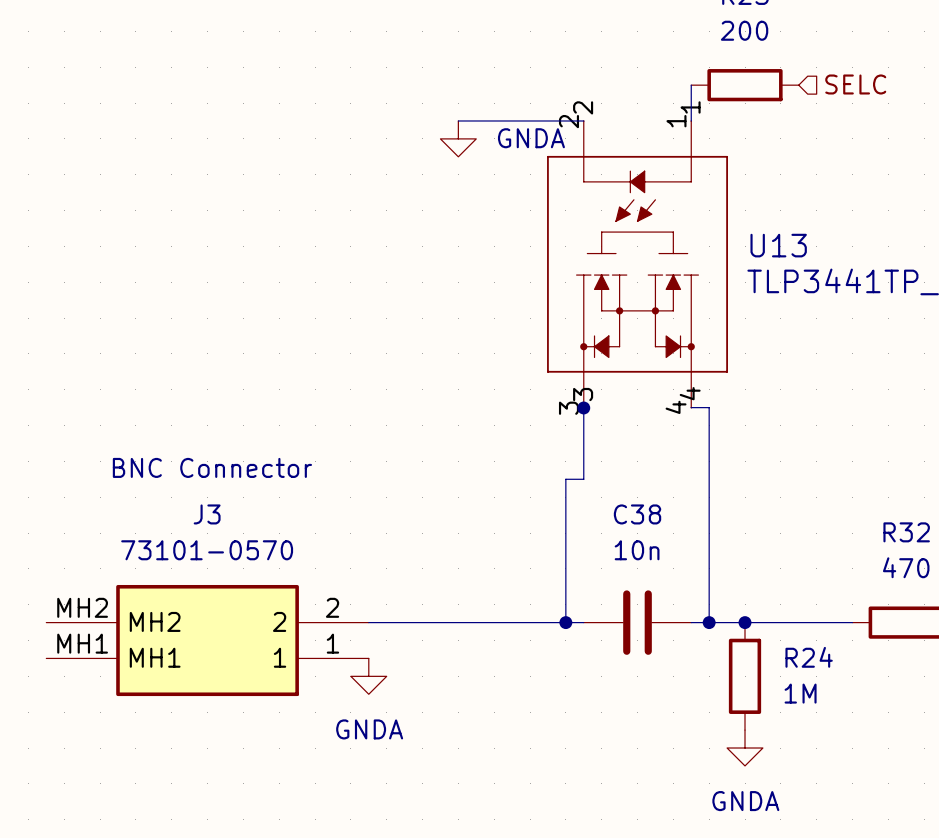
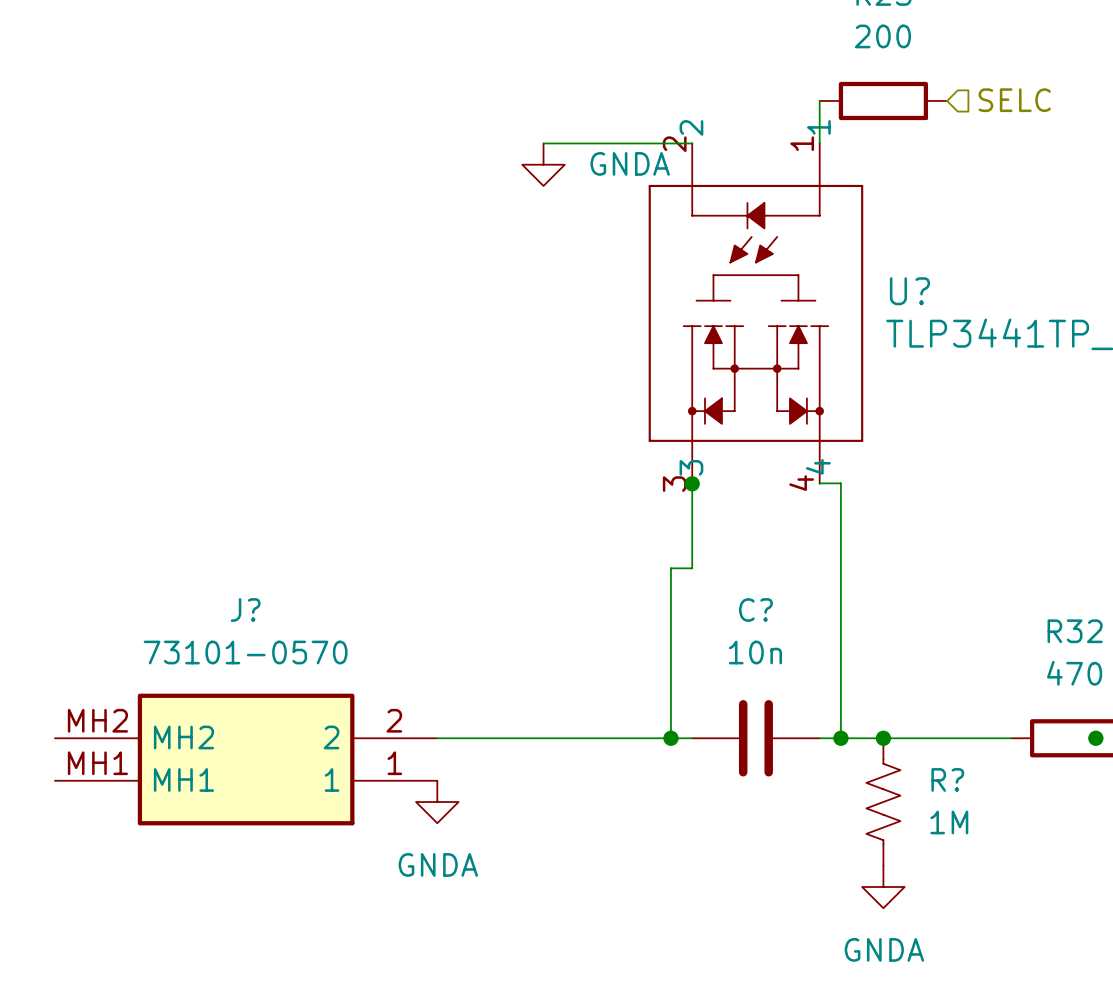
U13 name: U13 (778, 245) -> U? (909, 291)
text: BNC Connector (212, 467) -> none
J3 name: J3 (207, 514) -> J? (245, 610)
C38 name: C38 (637, 514) -> C? (755, 610)
junction: none -> (1095, 738)
R24: 1M (745, 676) -> none
R?: none -> 1M (883, 802)

